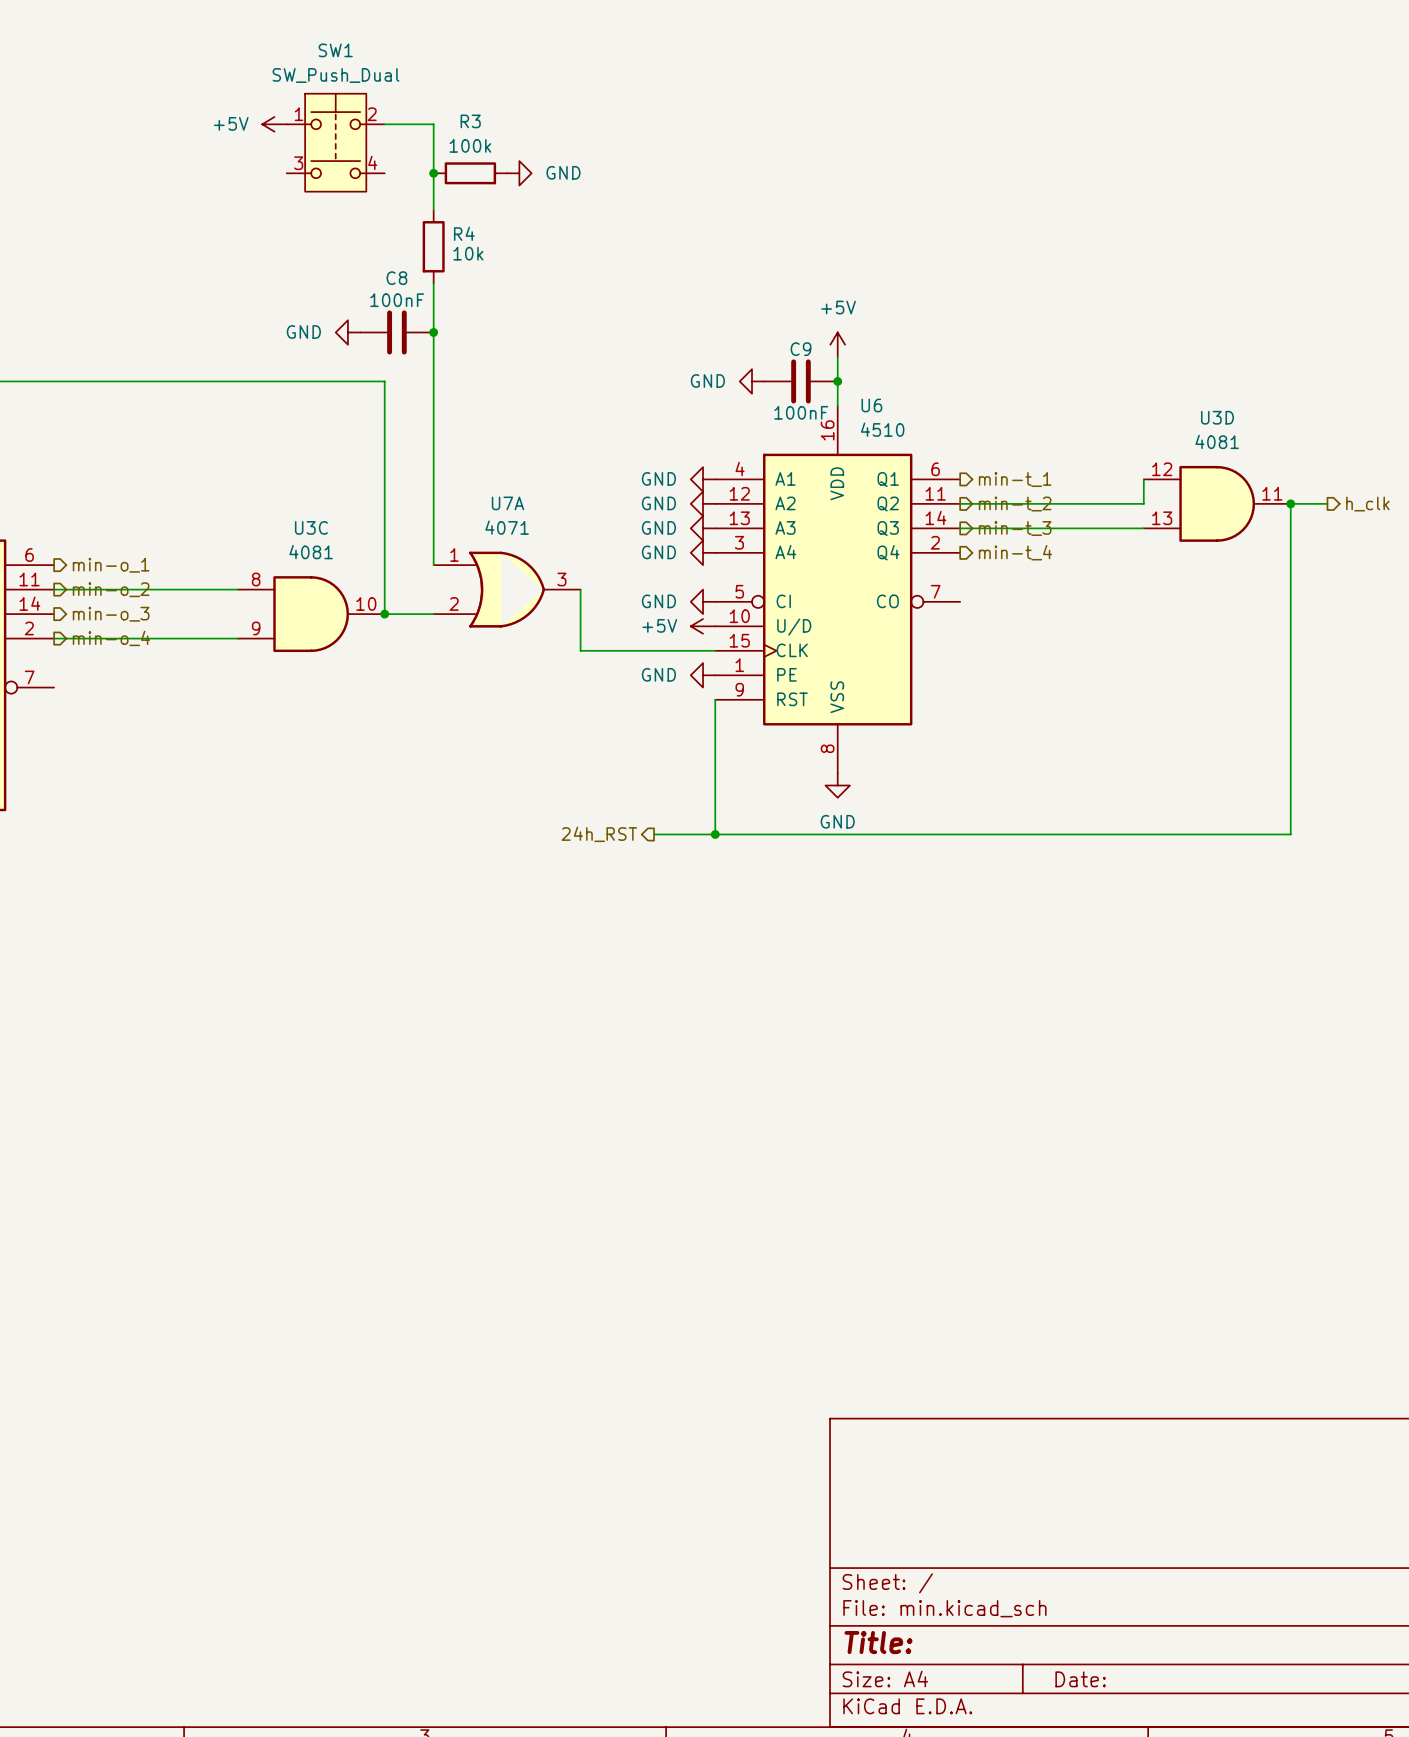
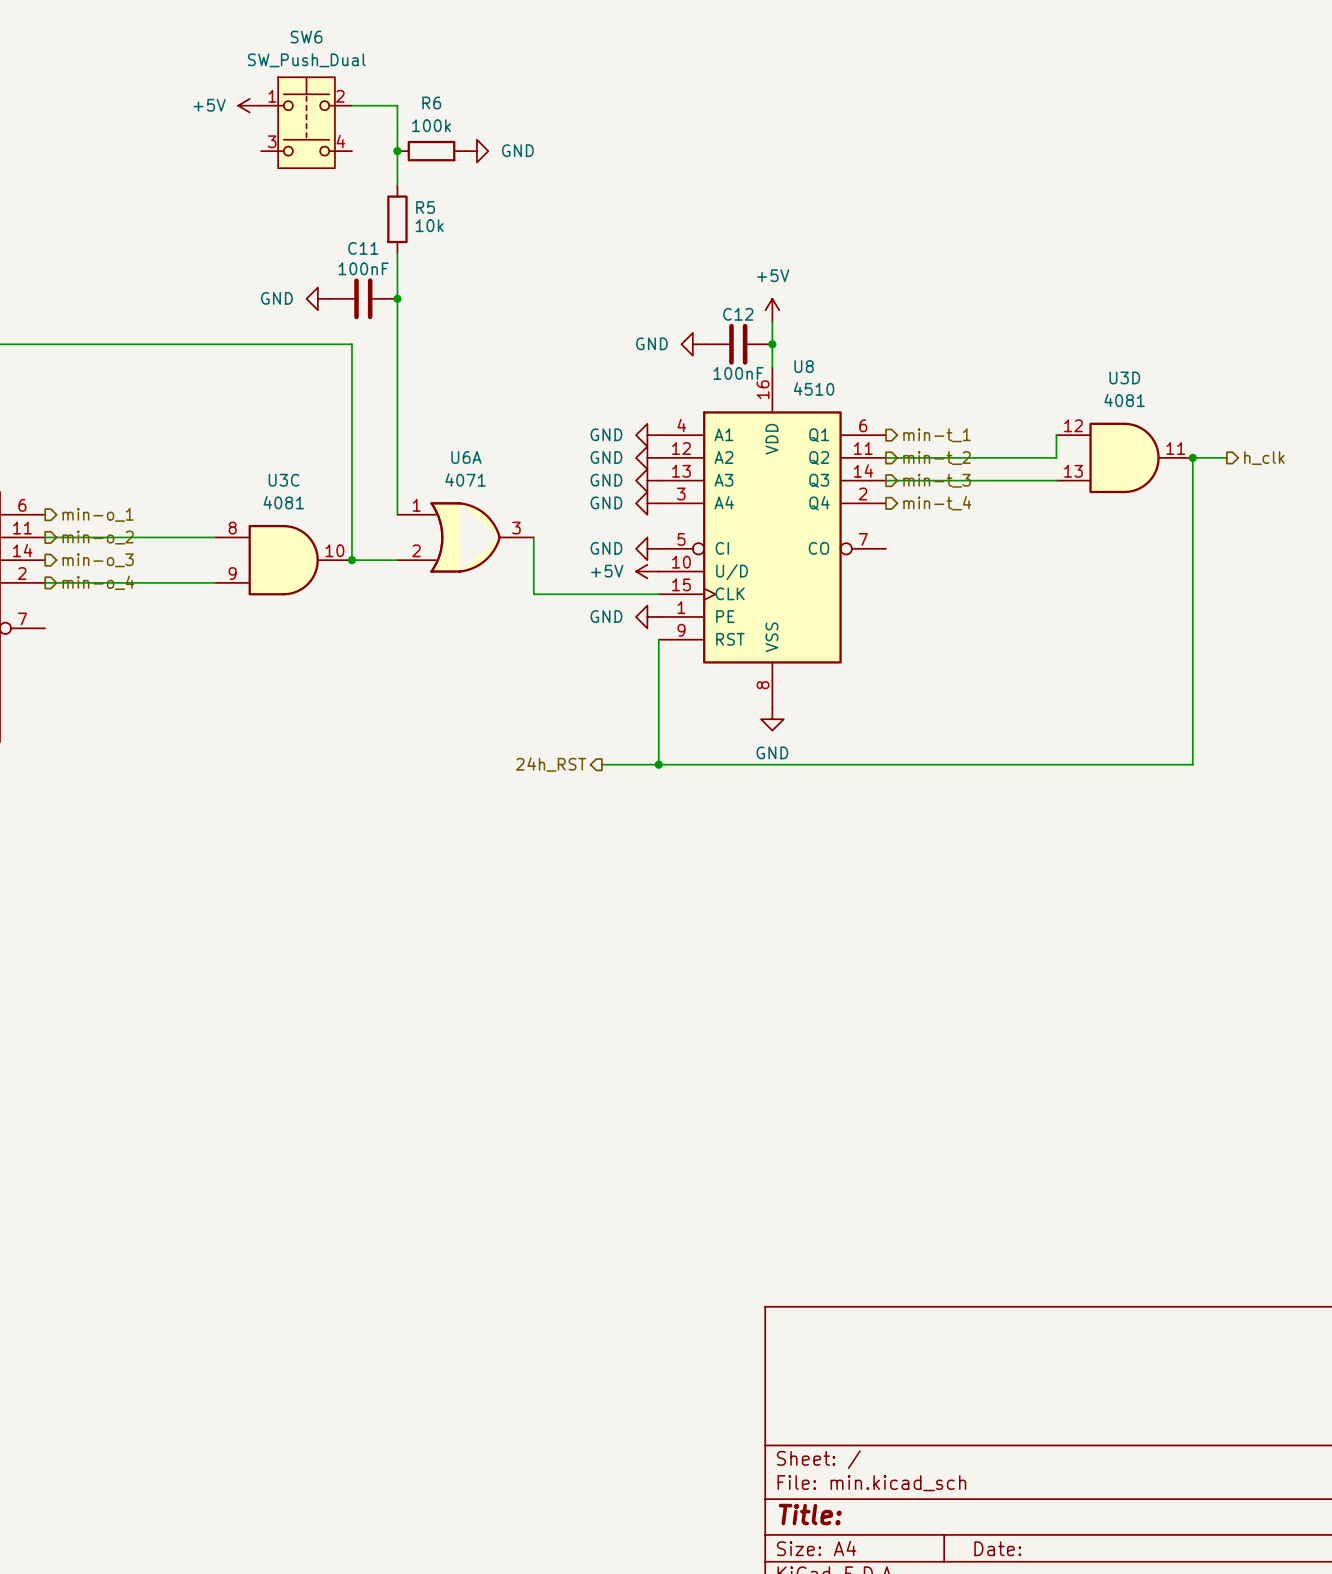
SW1 name: SW1 (335, 50) -> SW6 (306, 37)
R3 name: R3 (470, 121) -> R6 (431, 102)
R4 name: R4 (464, 233) -> R5 (425, 207)
C8 name: C8 (396, 278) -> C11 (363, 248)
C9 name: C9 (800, 349) -> C12 (738, 314)
U6 name: U6 (871, 405) -> U8 (804, 366)
U7A name: U7A (508, 503) -> U6A (466, 457)

